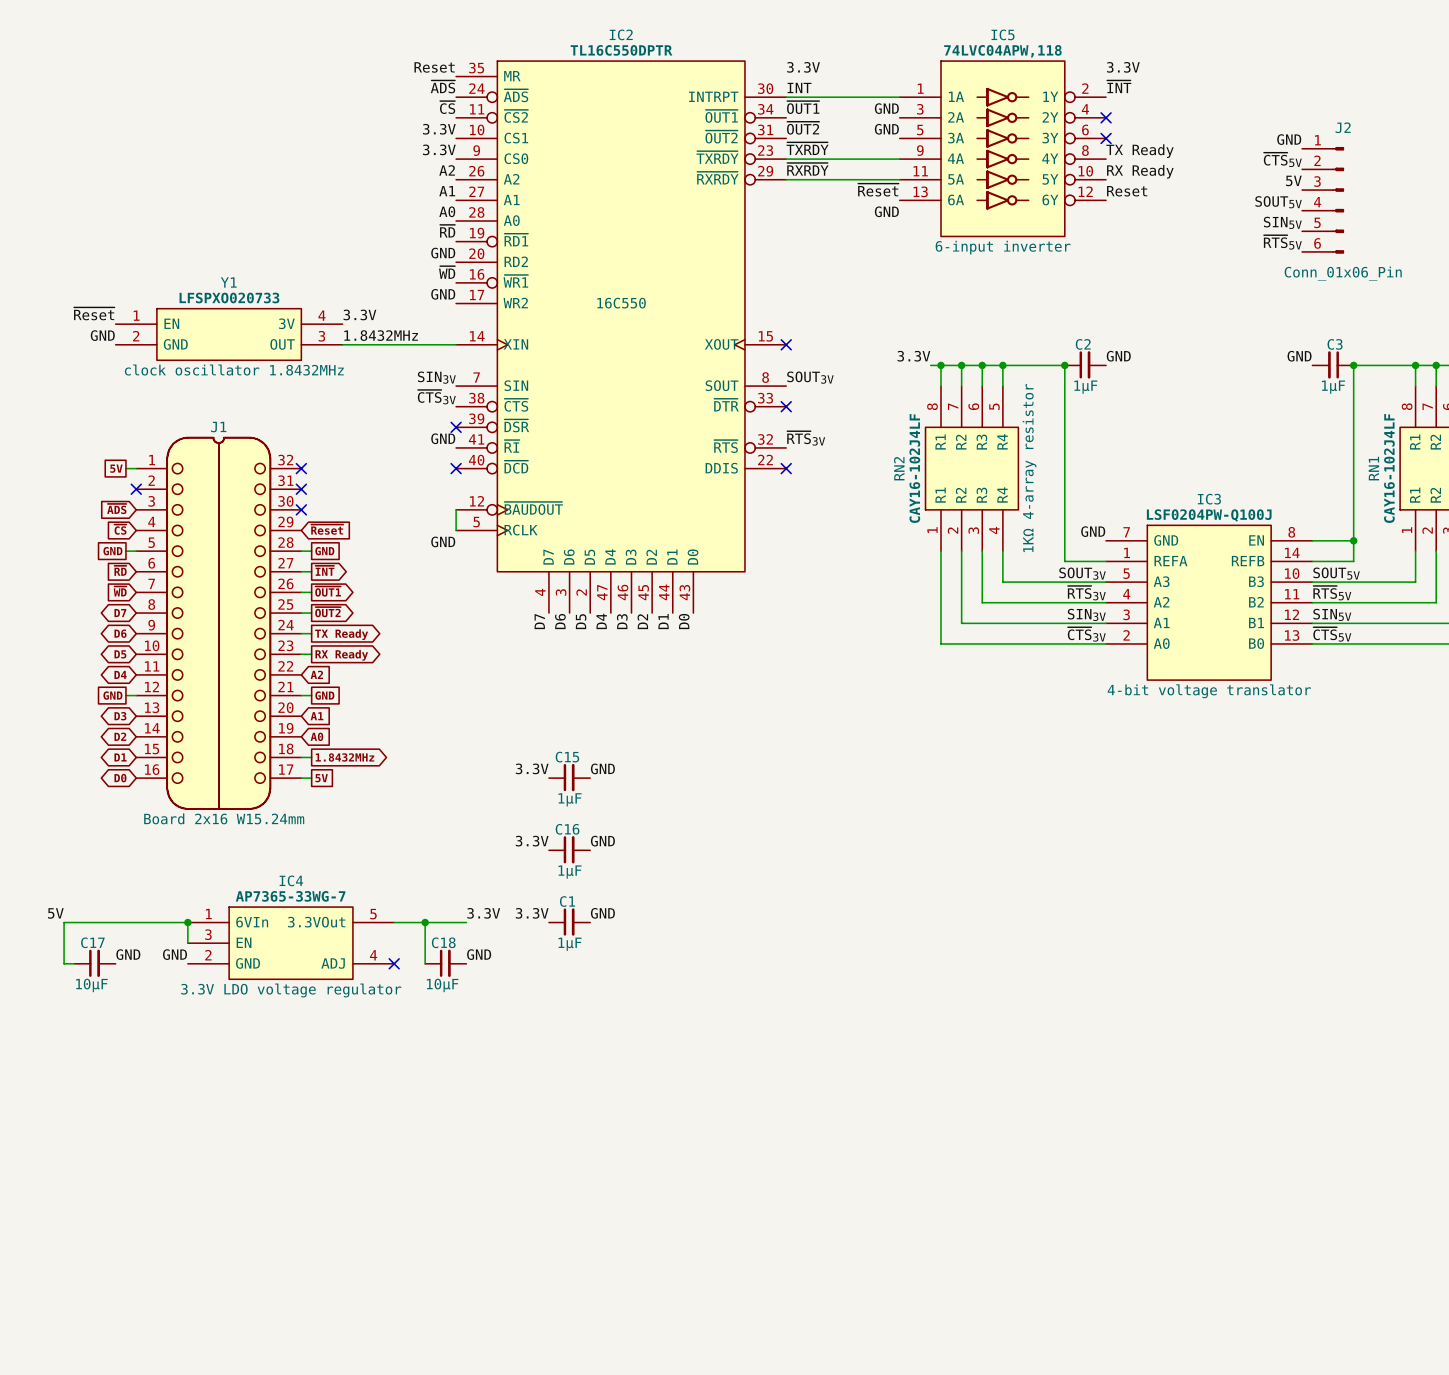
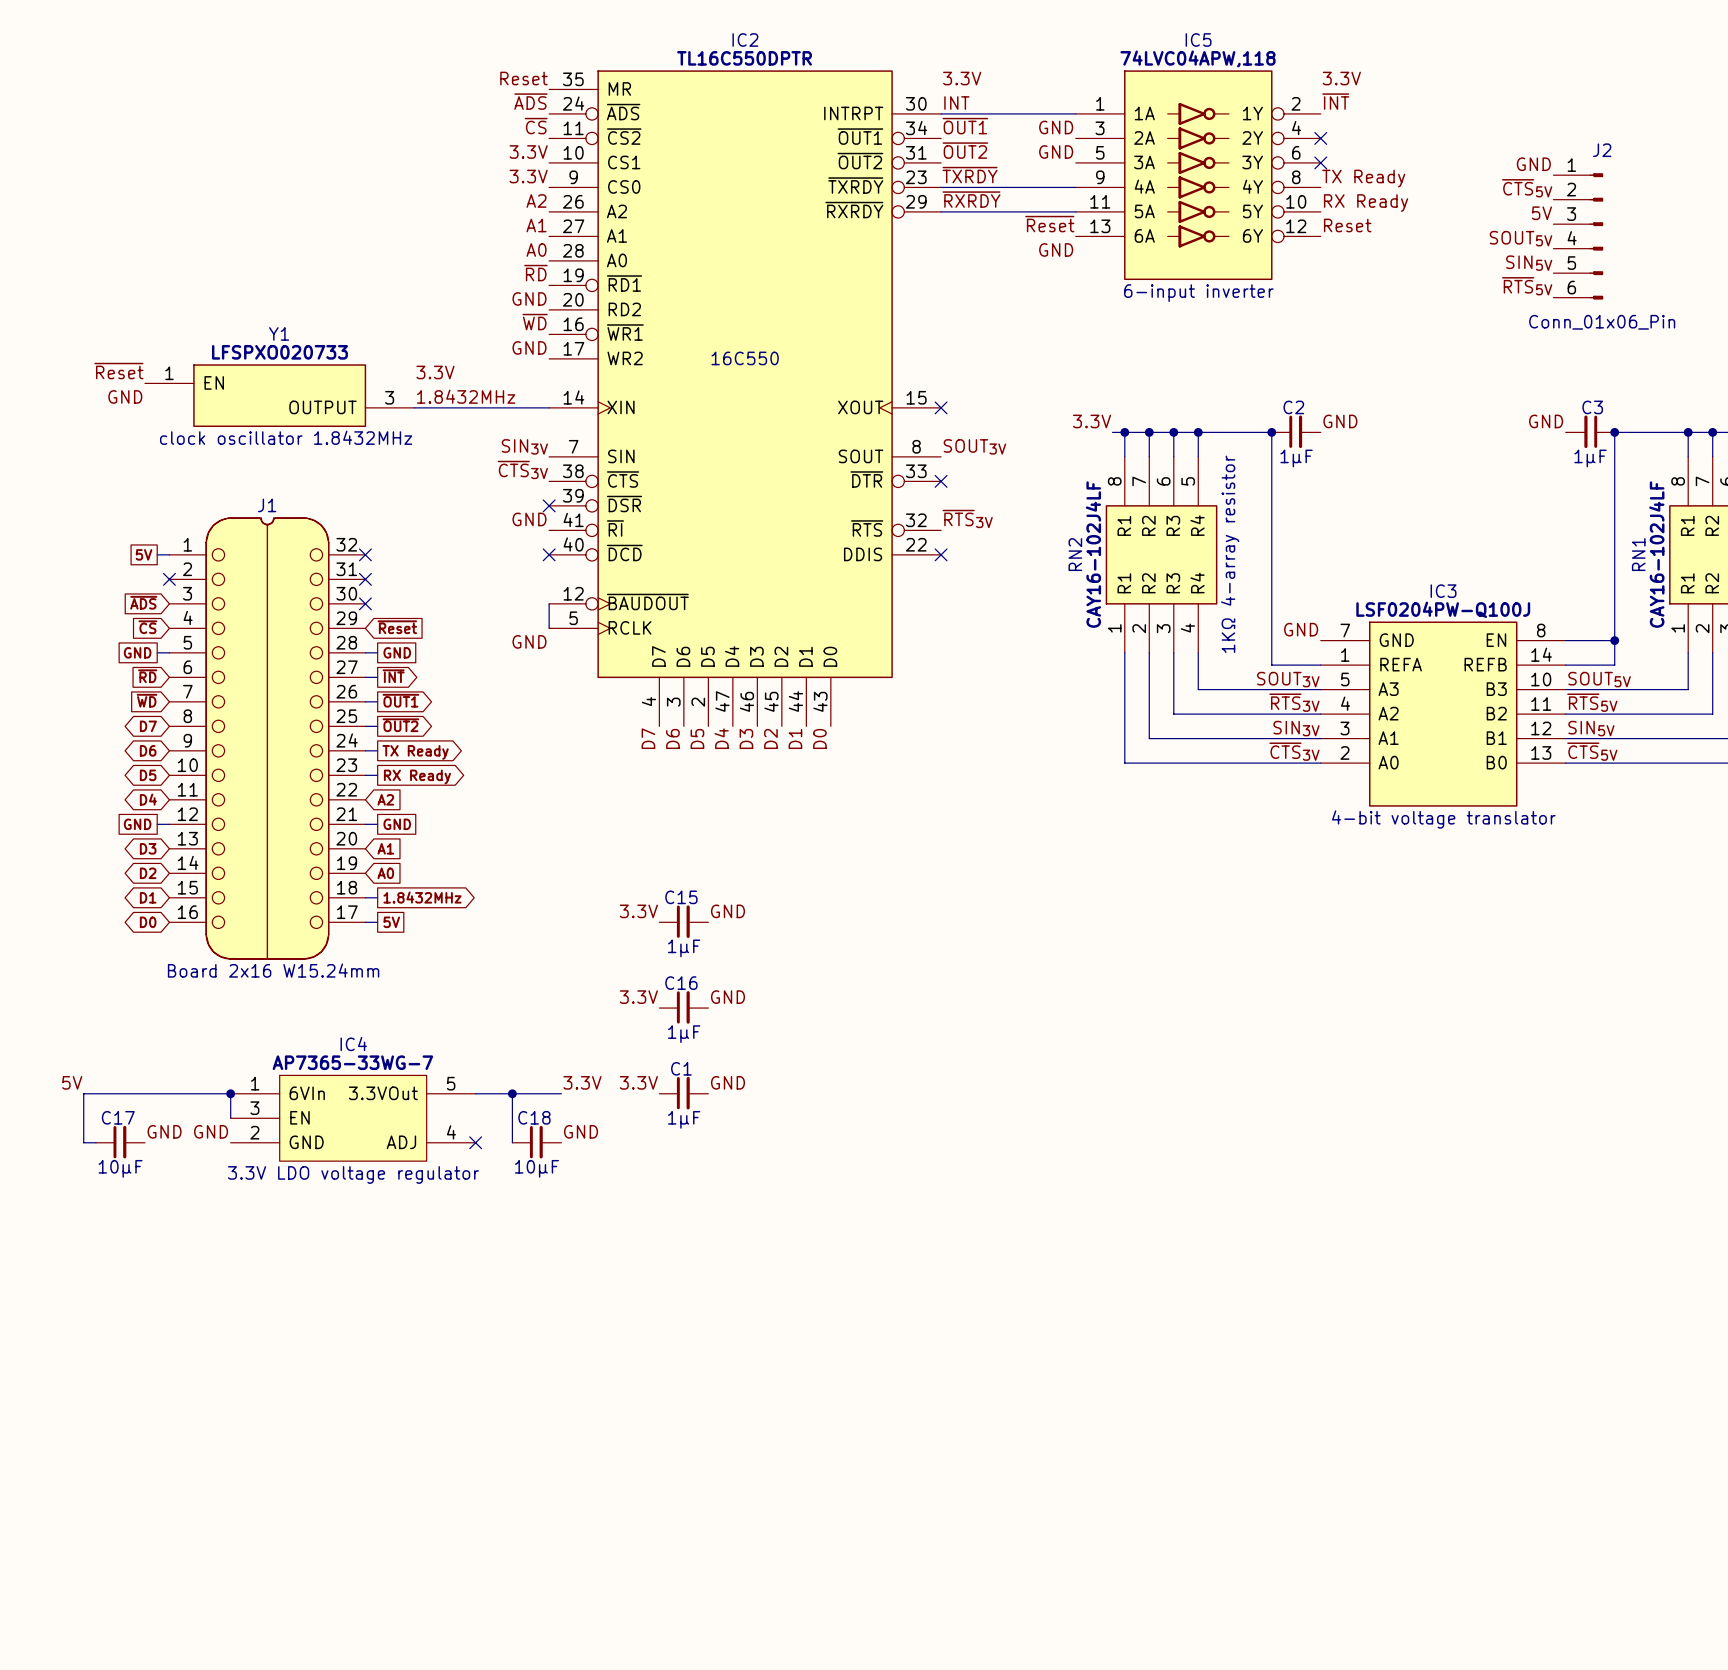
Y1 symbol: [115, 308, 343, 361] -> [144, 364, 415, 428]

